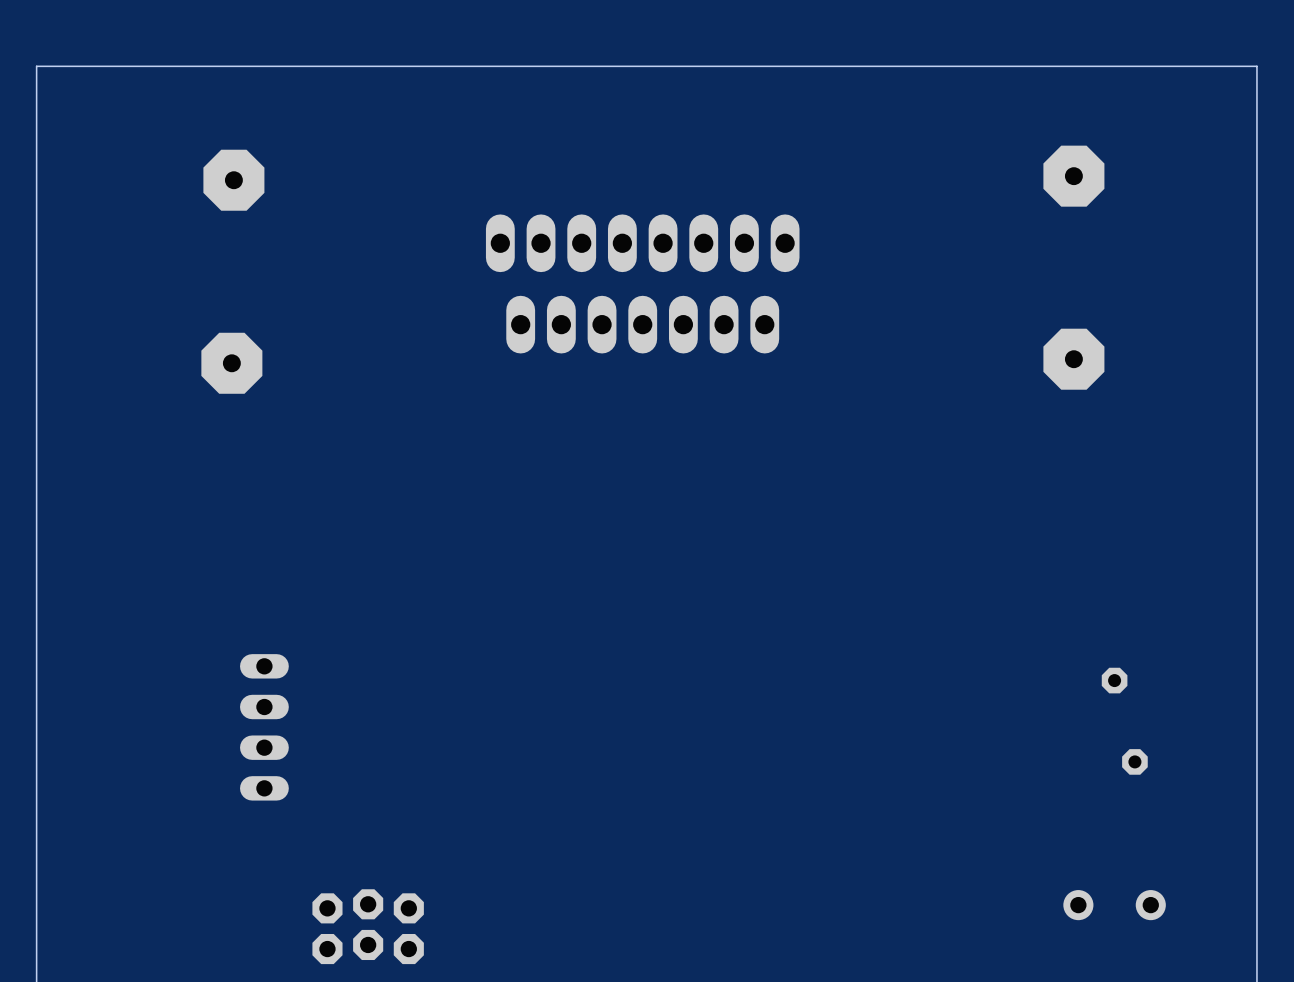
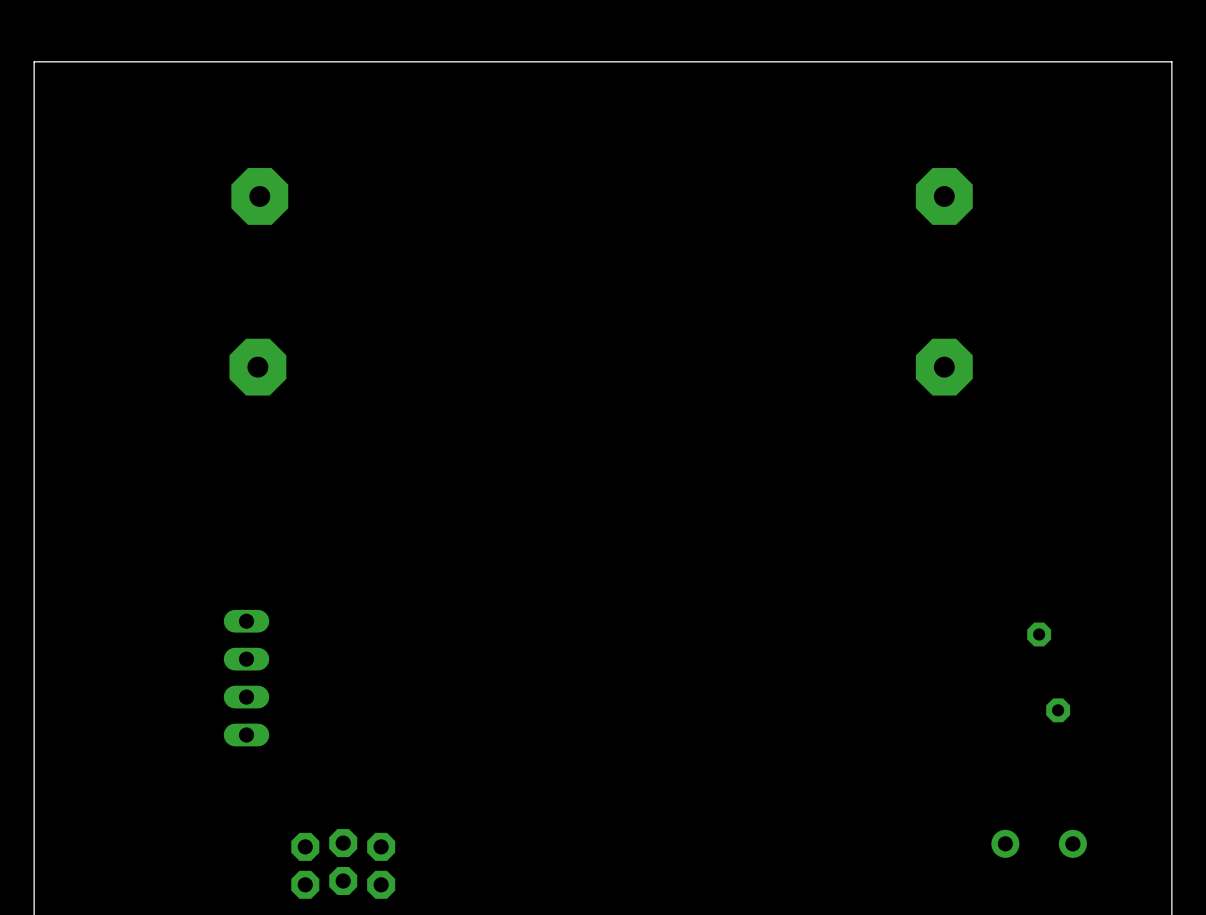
part: (1073, 176) -> none
part: (233, 180) -> none
part: none -> (259, 196)
part: none -> (944, 196)
part: (642, 283) -> none
part: (1073, 359) -> none
part: (231, 363) -> none
part: none -> (257, 367)
part: none -> (944, 367)

